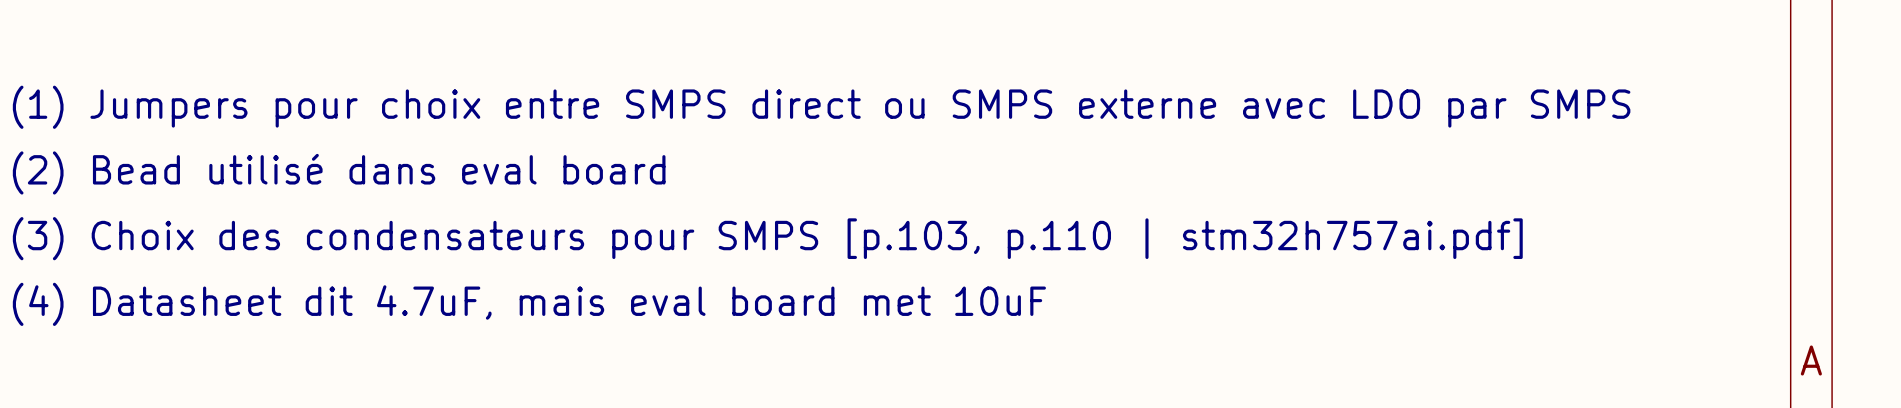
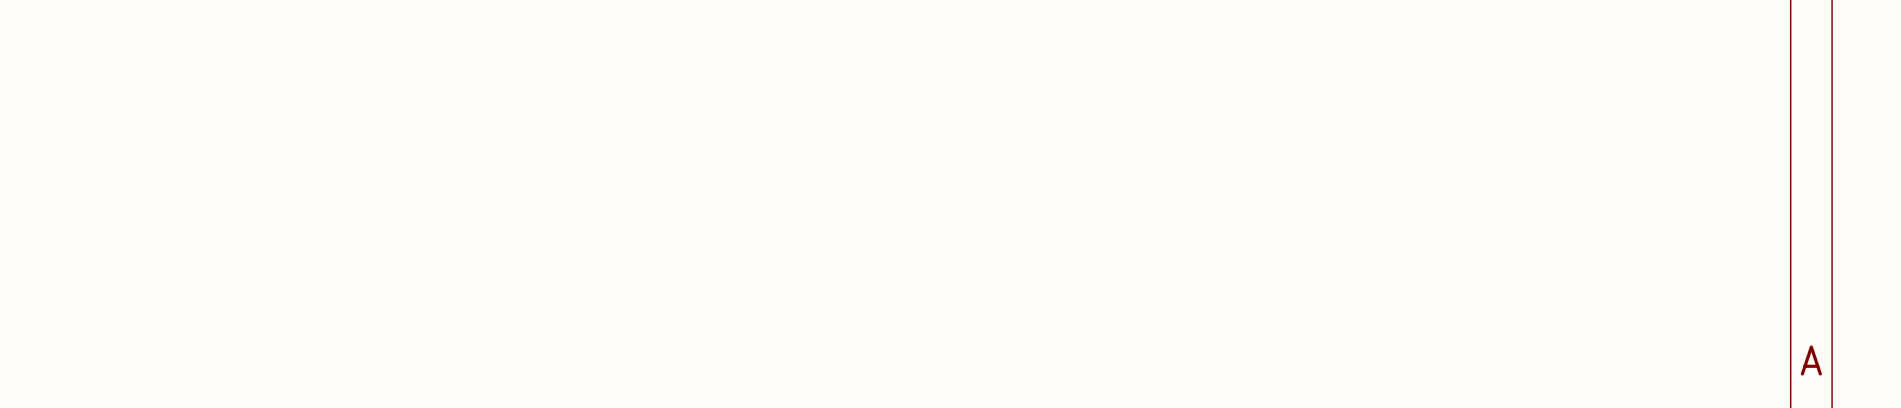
text: (1) Jumpers pour choix entre SMPS direct ou SMPS externe avec LDO par SMPS (821, 107) -> none
text: (2) Bead utilisé dans eval board (339, 172) -> none
text: (3) Choix des condensateurs pour SMPS [p.103, p.110 | stm32h757ai.pdf] (767, 238) -> none
text: (4) Datasheet dit 4.7uF, mais eval board met 10uF (529, 304) -> none

